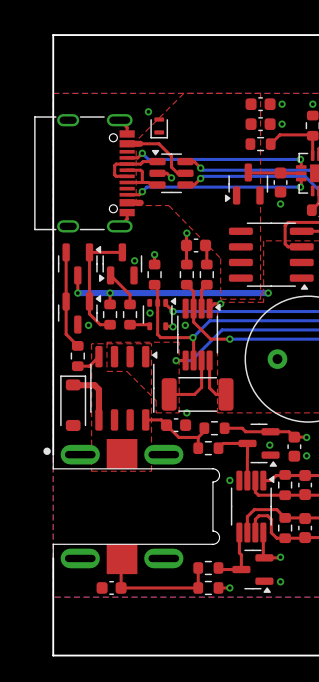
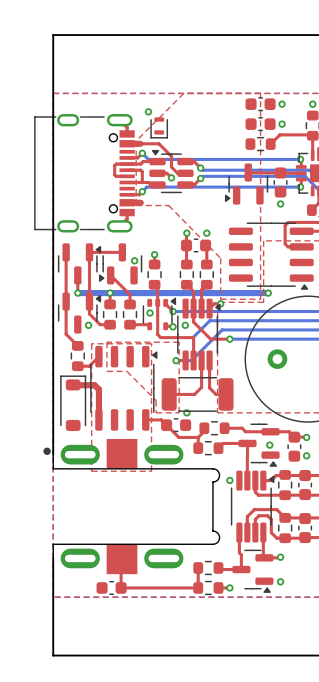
via: none -> (206, 233)
via: (193, 337) -> none

